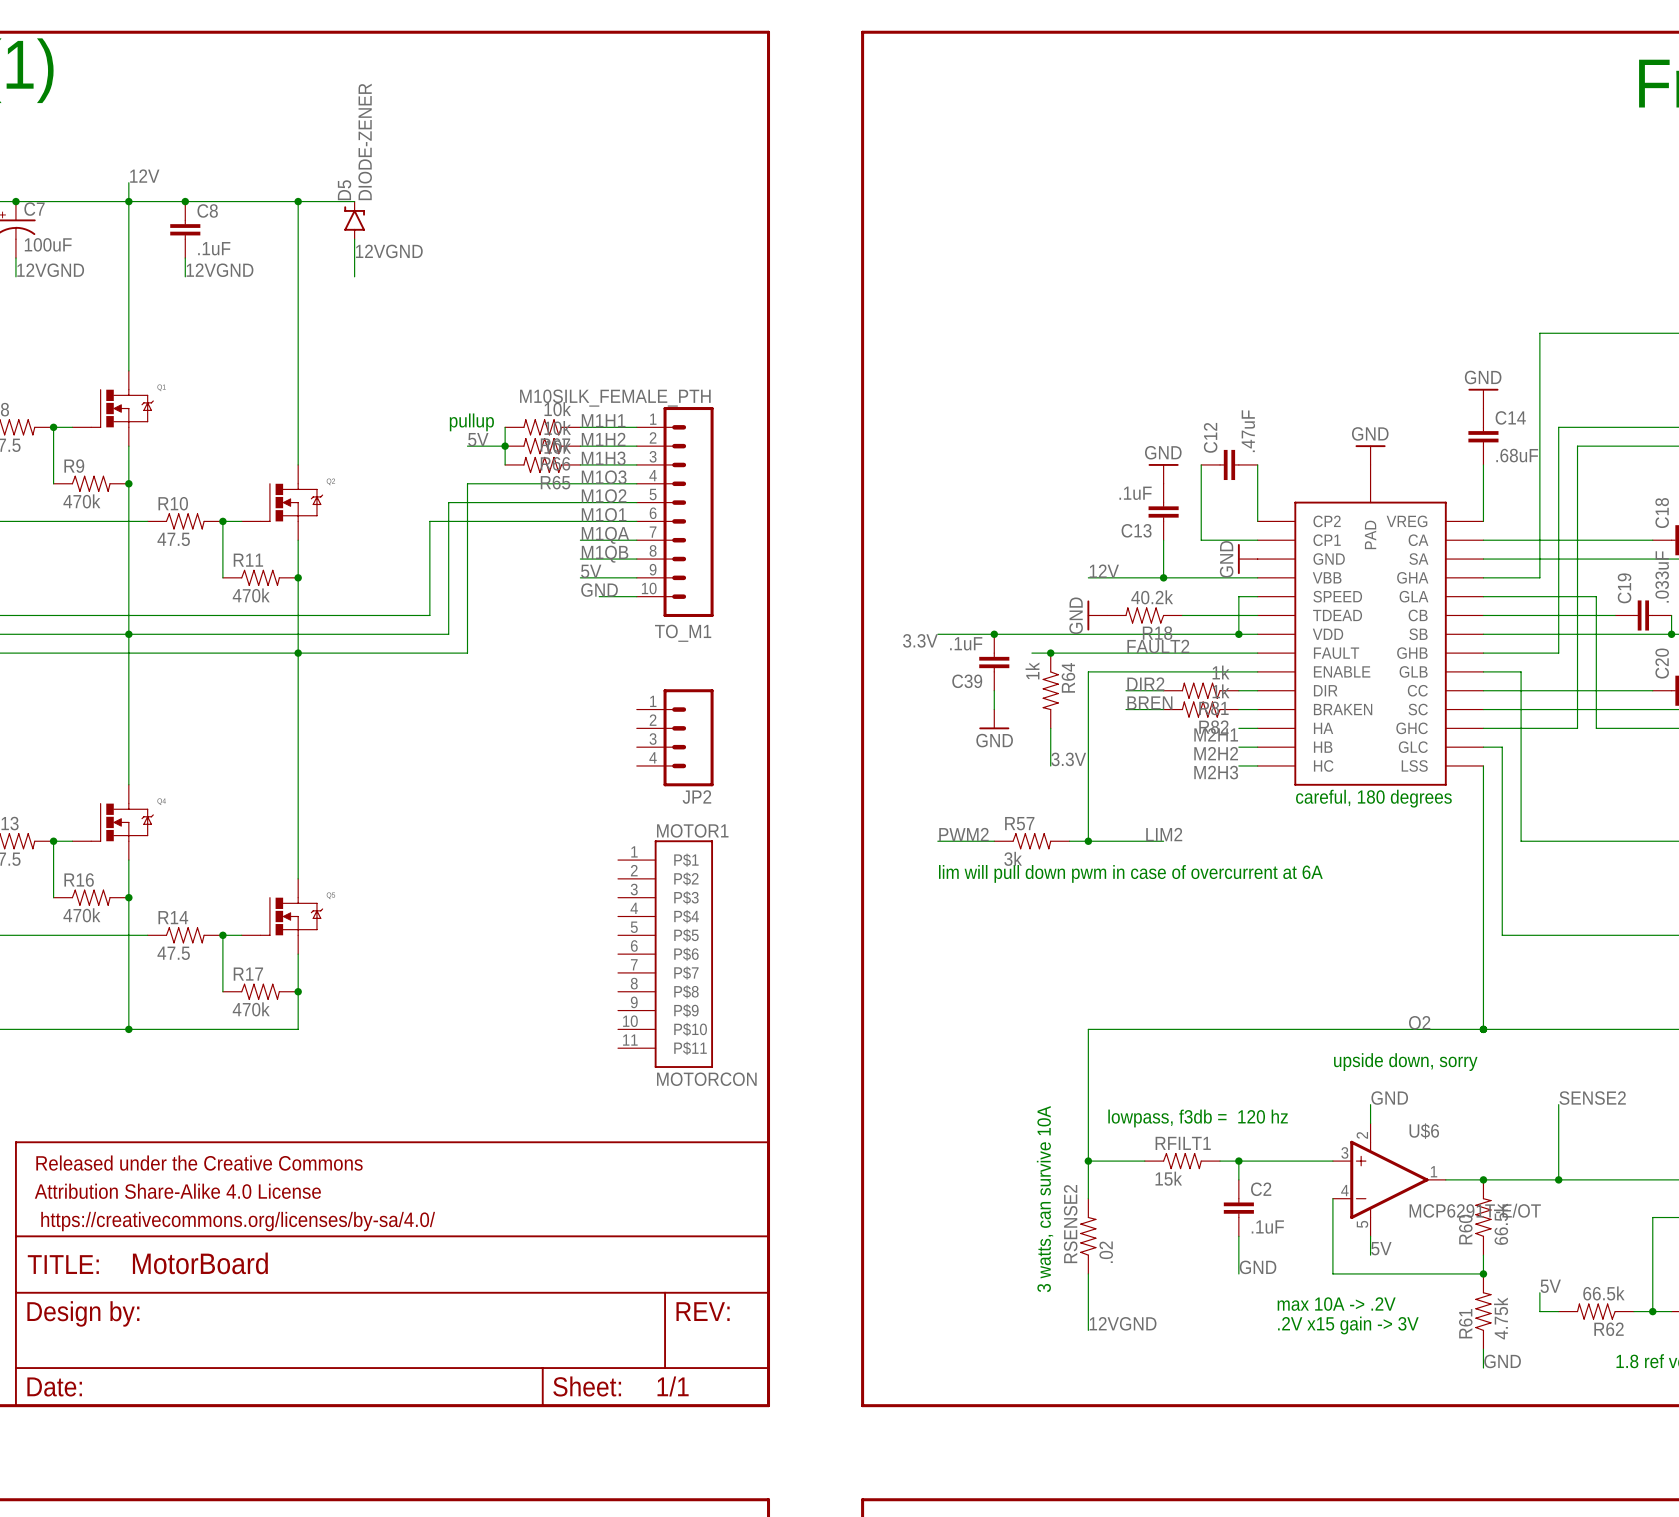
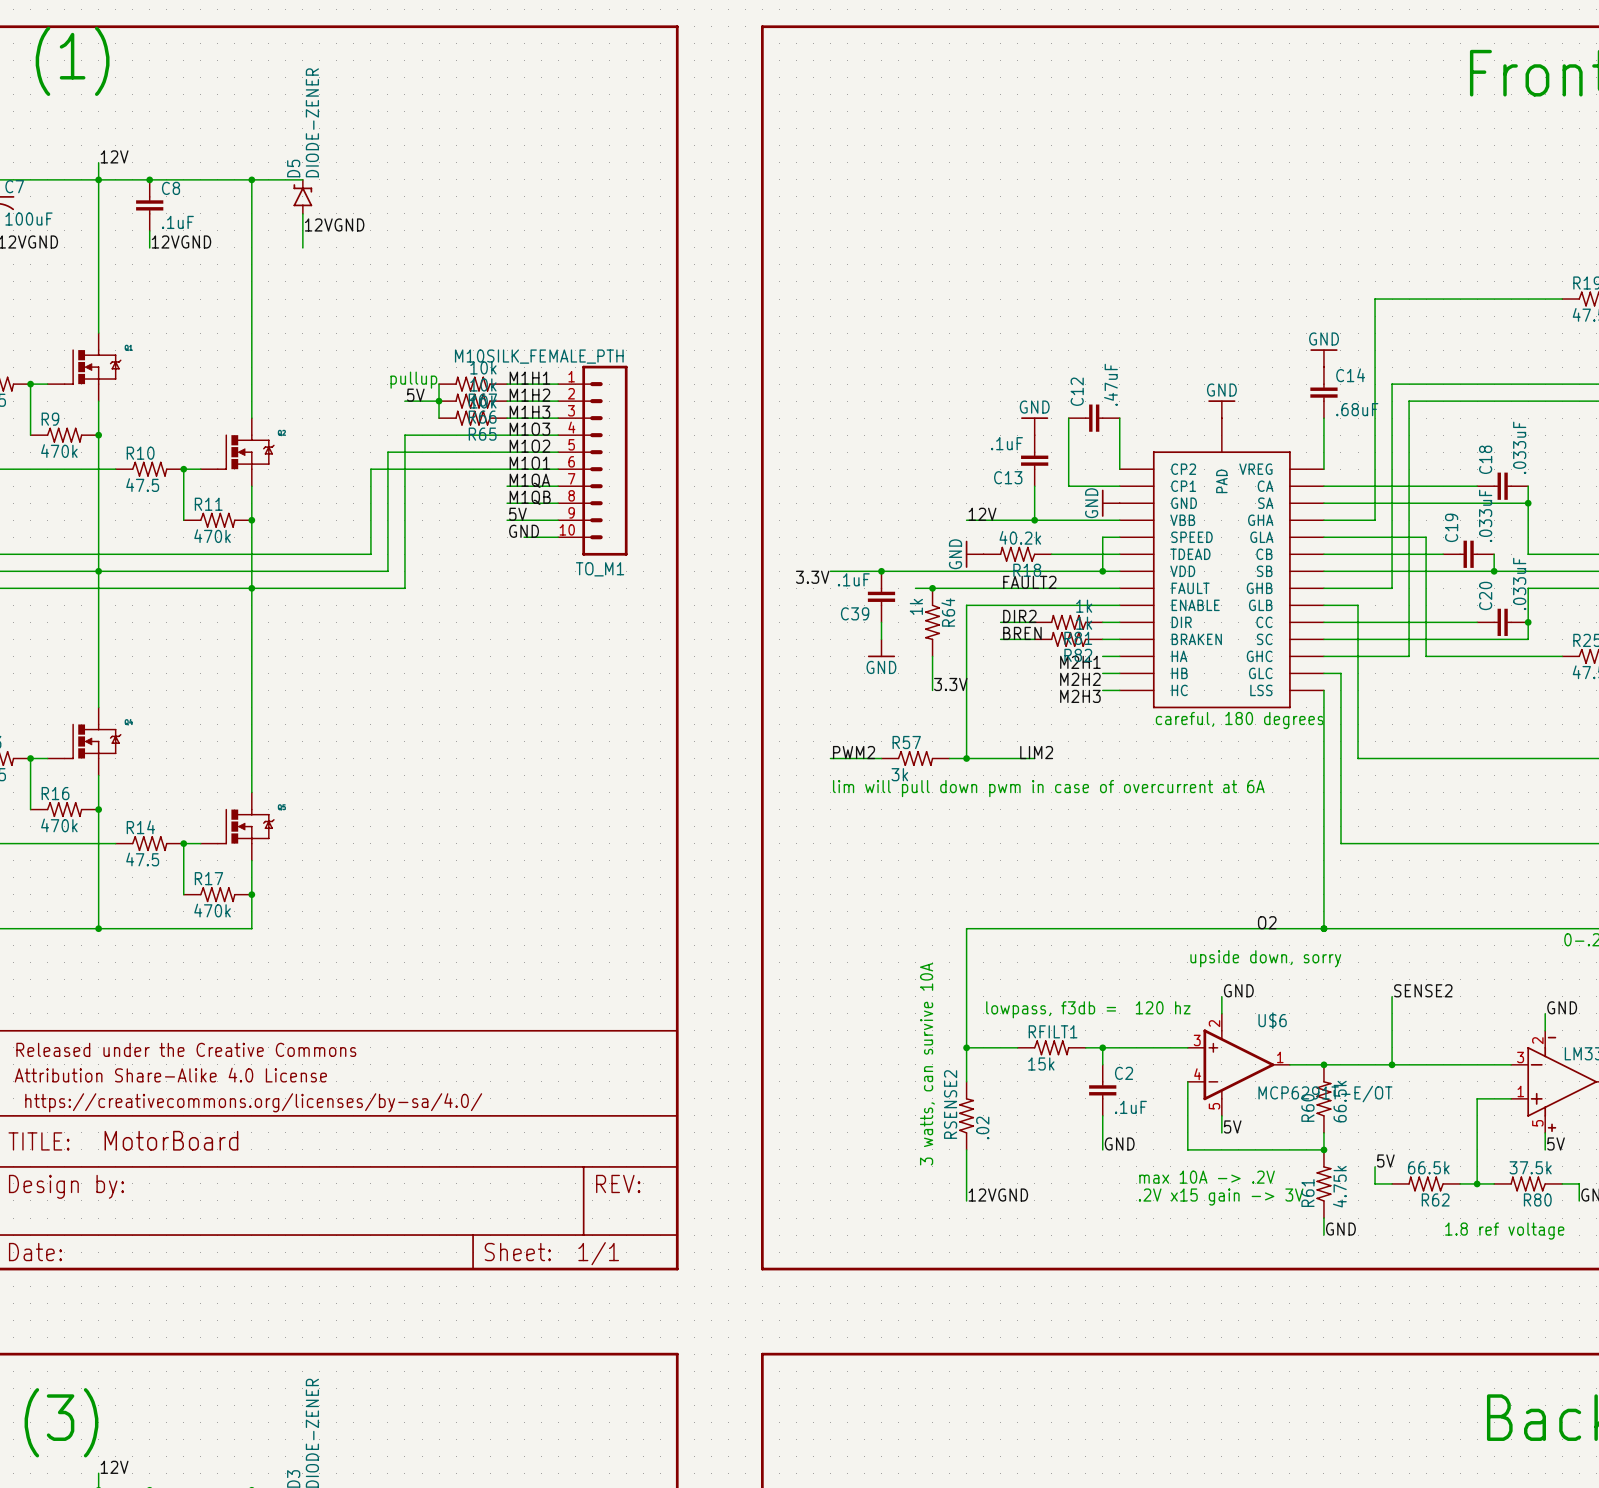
JP2: (675, 737) -> none
MOTOR1: MOTORCON (665, 954) -> none

